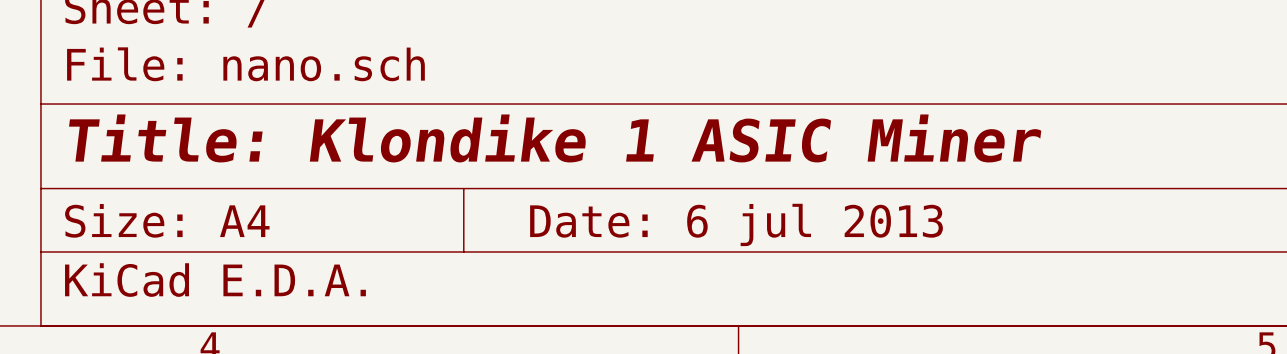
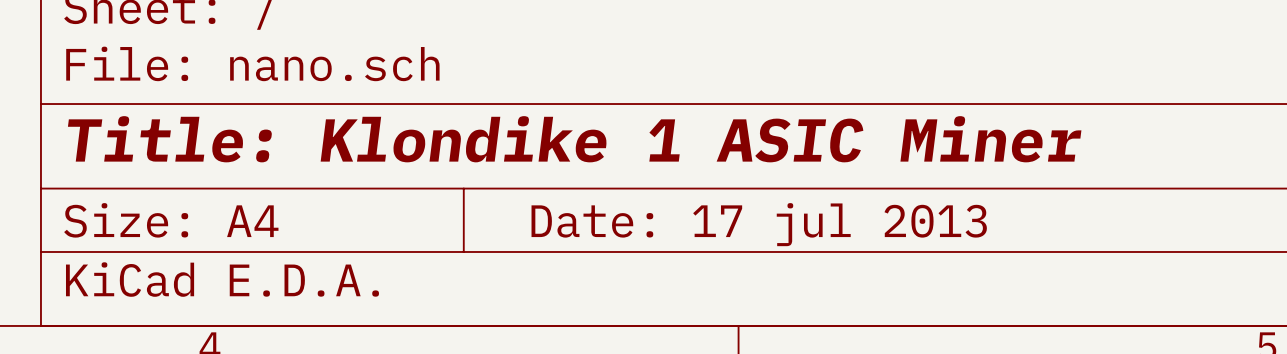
title block: Date: 6 jul 2013 (736, 224) -> Date: 17 jul 2013 (759, 224)

